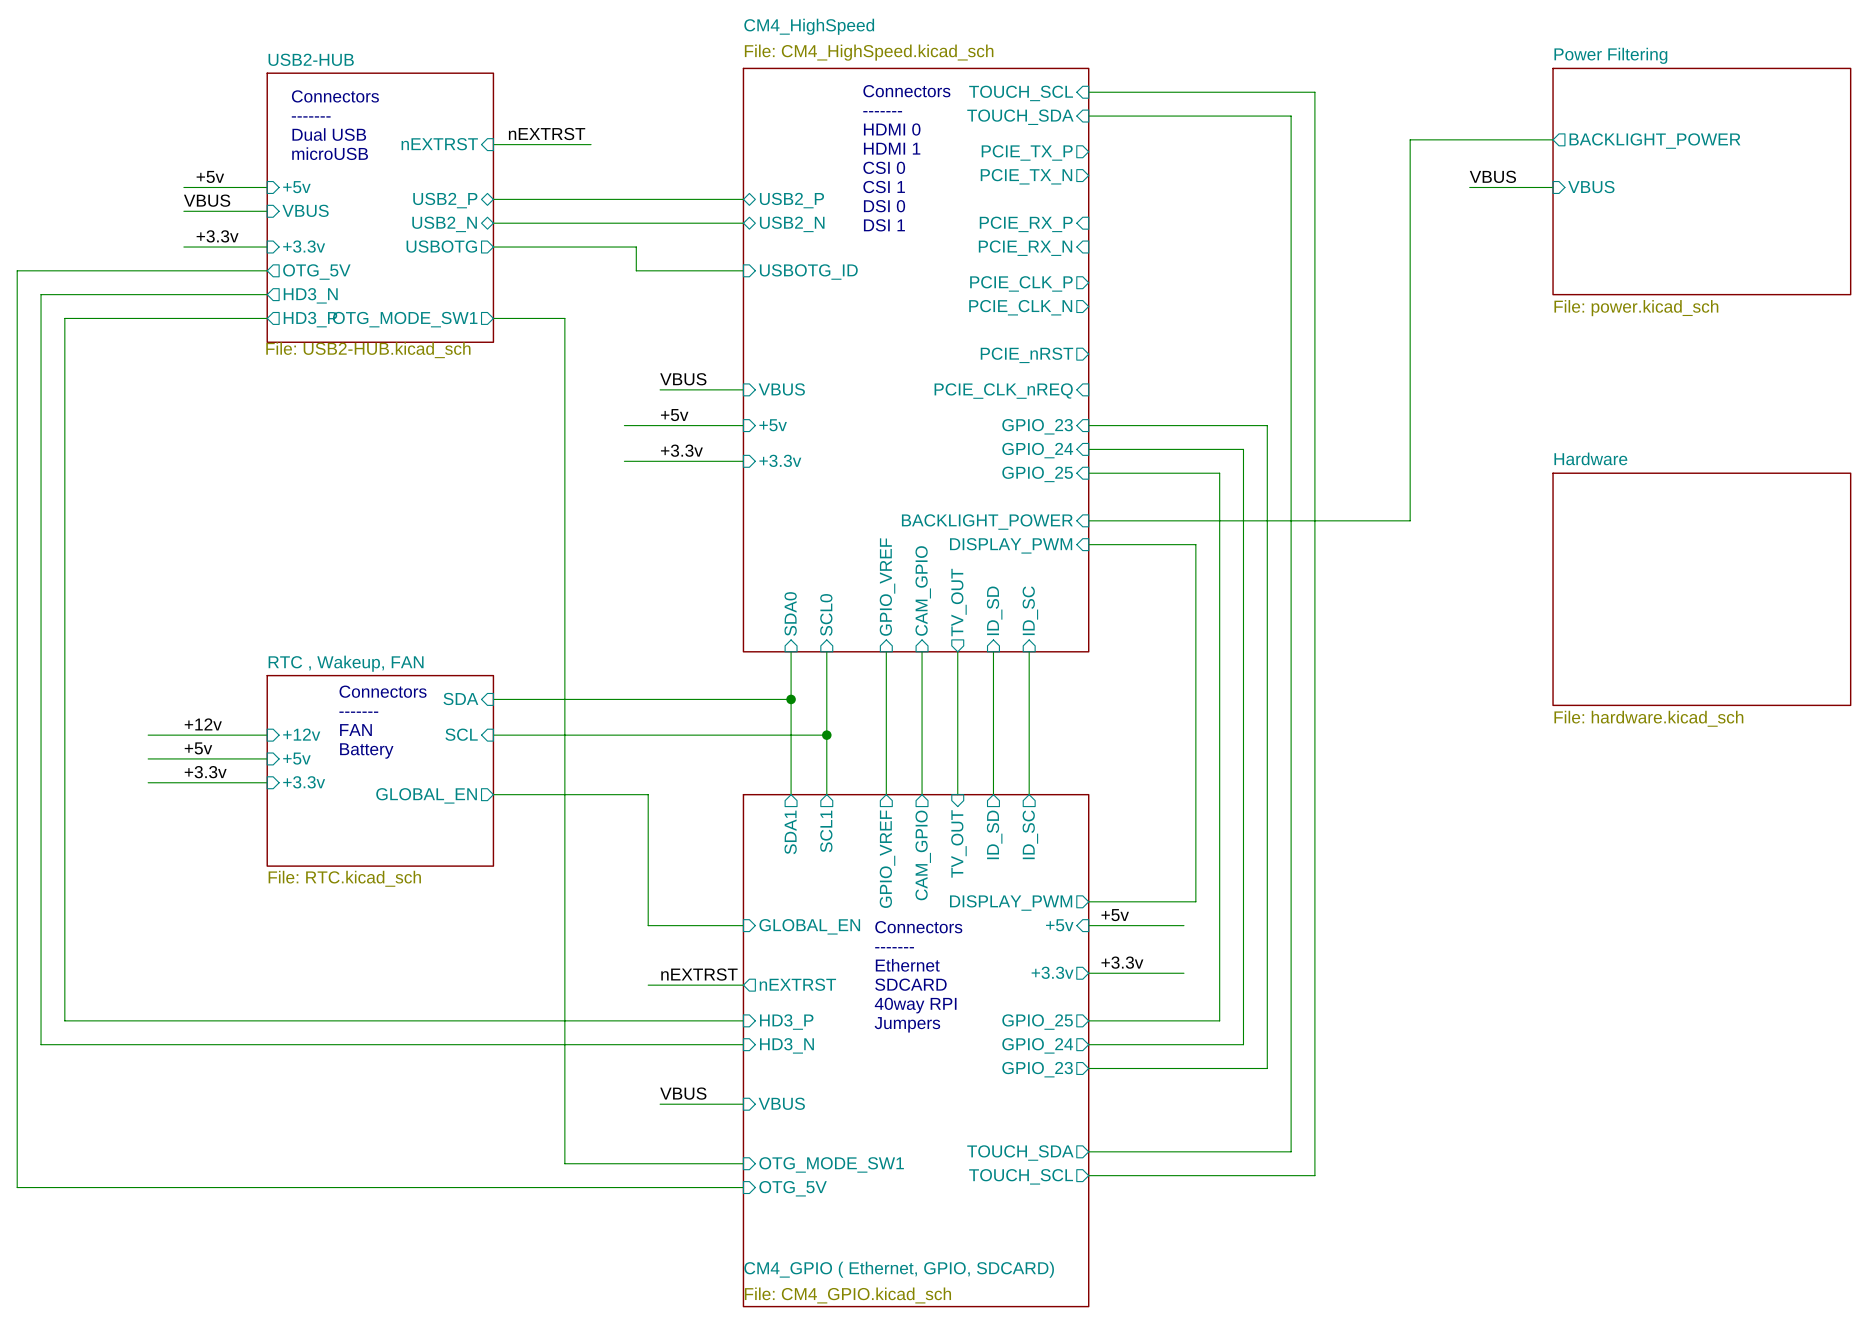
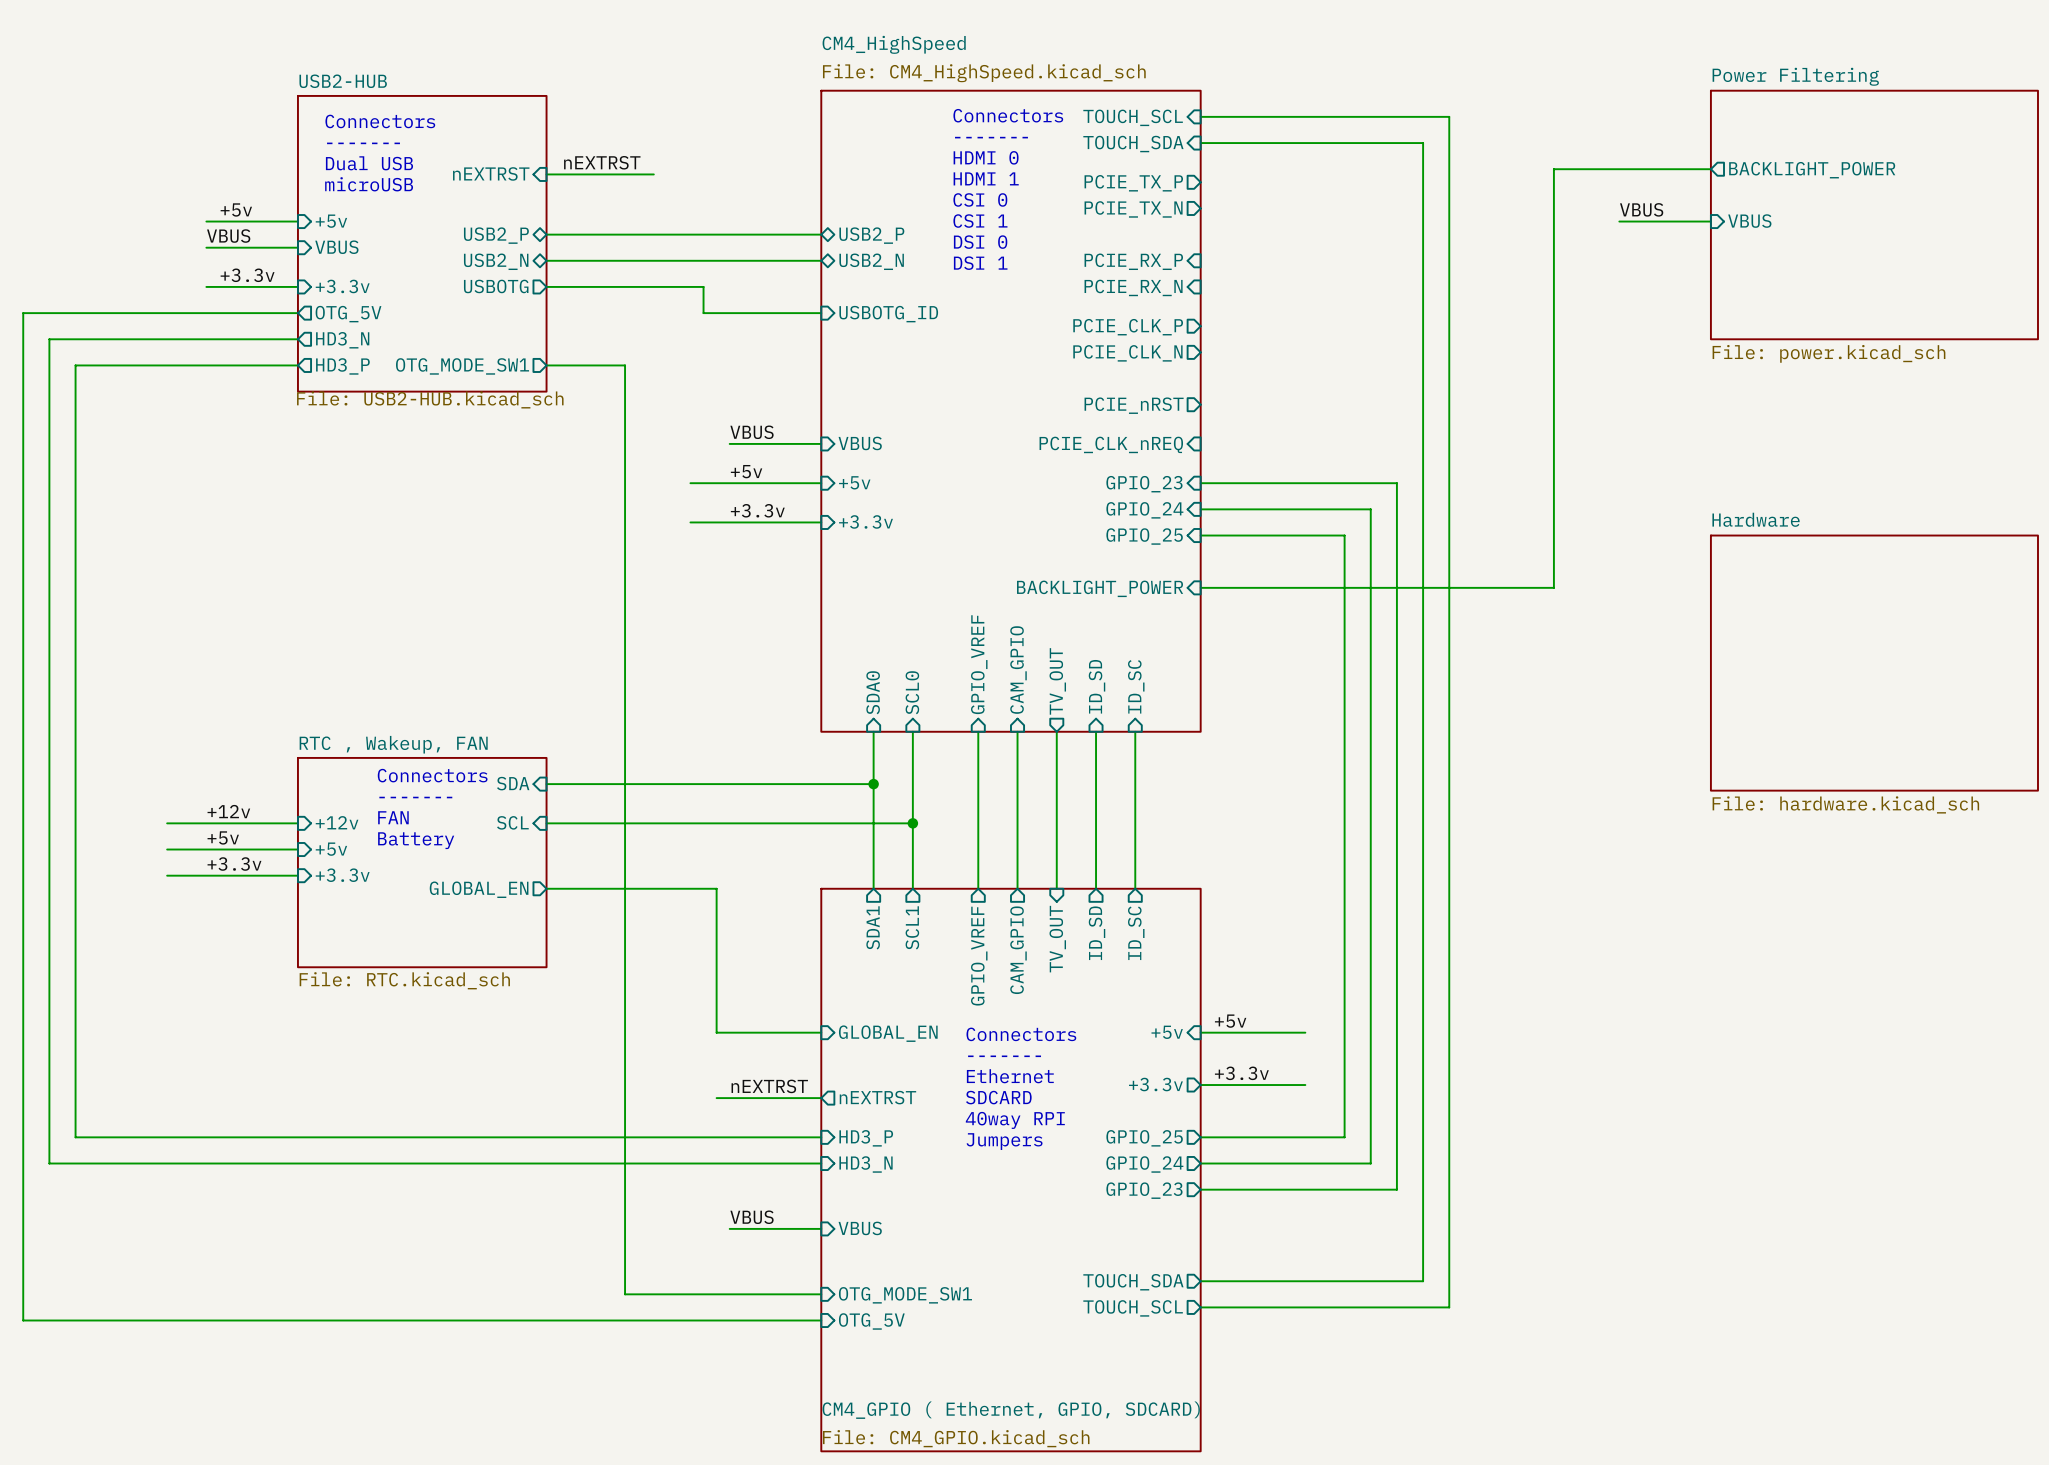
wire: (1088, 544) (1195, 544) (1195, 901) (1088, 901) -> none
sheet pin: DISPLAY_PWM (1011, 545) -> none
sheet pin: DISPLAY_PWM (1011, 903) -> none

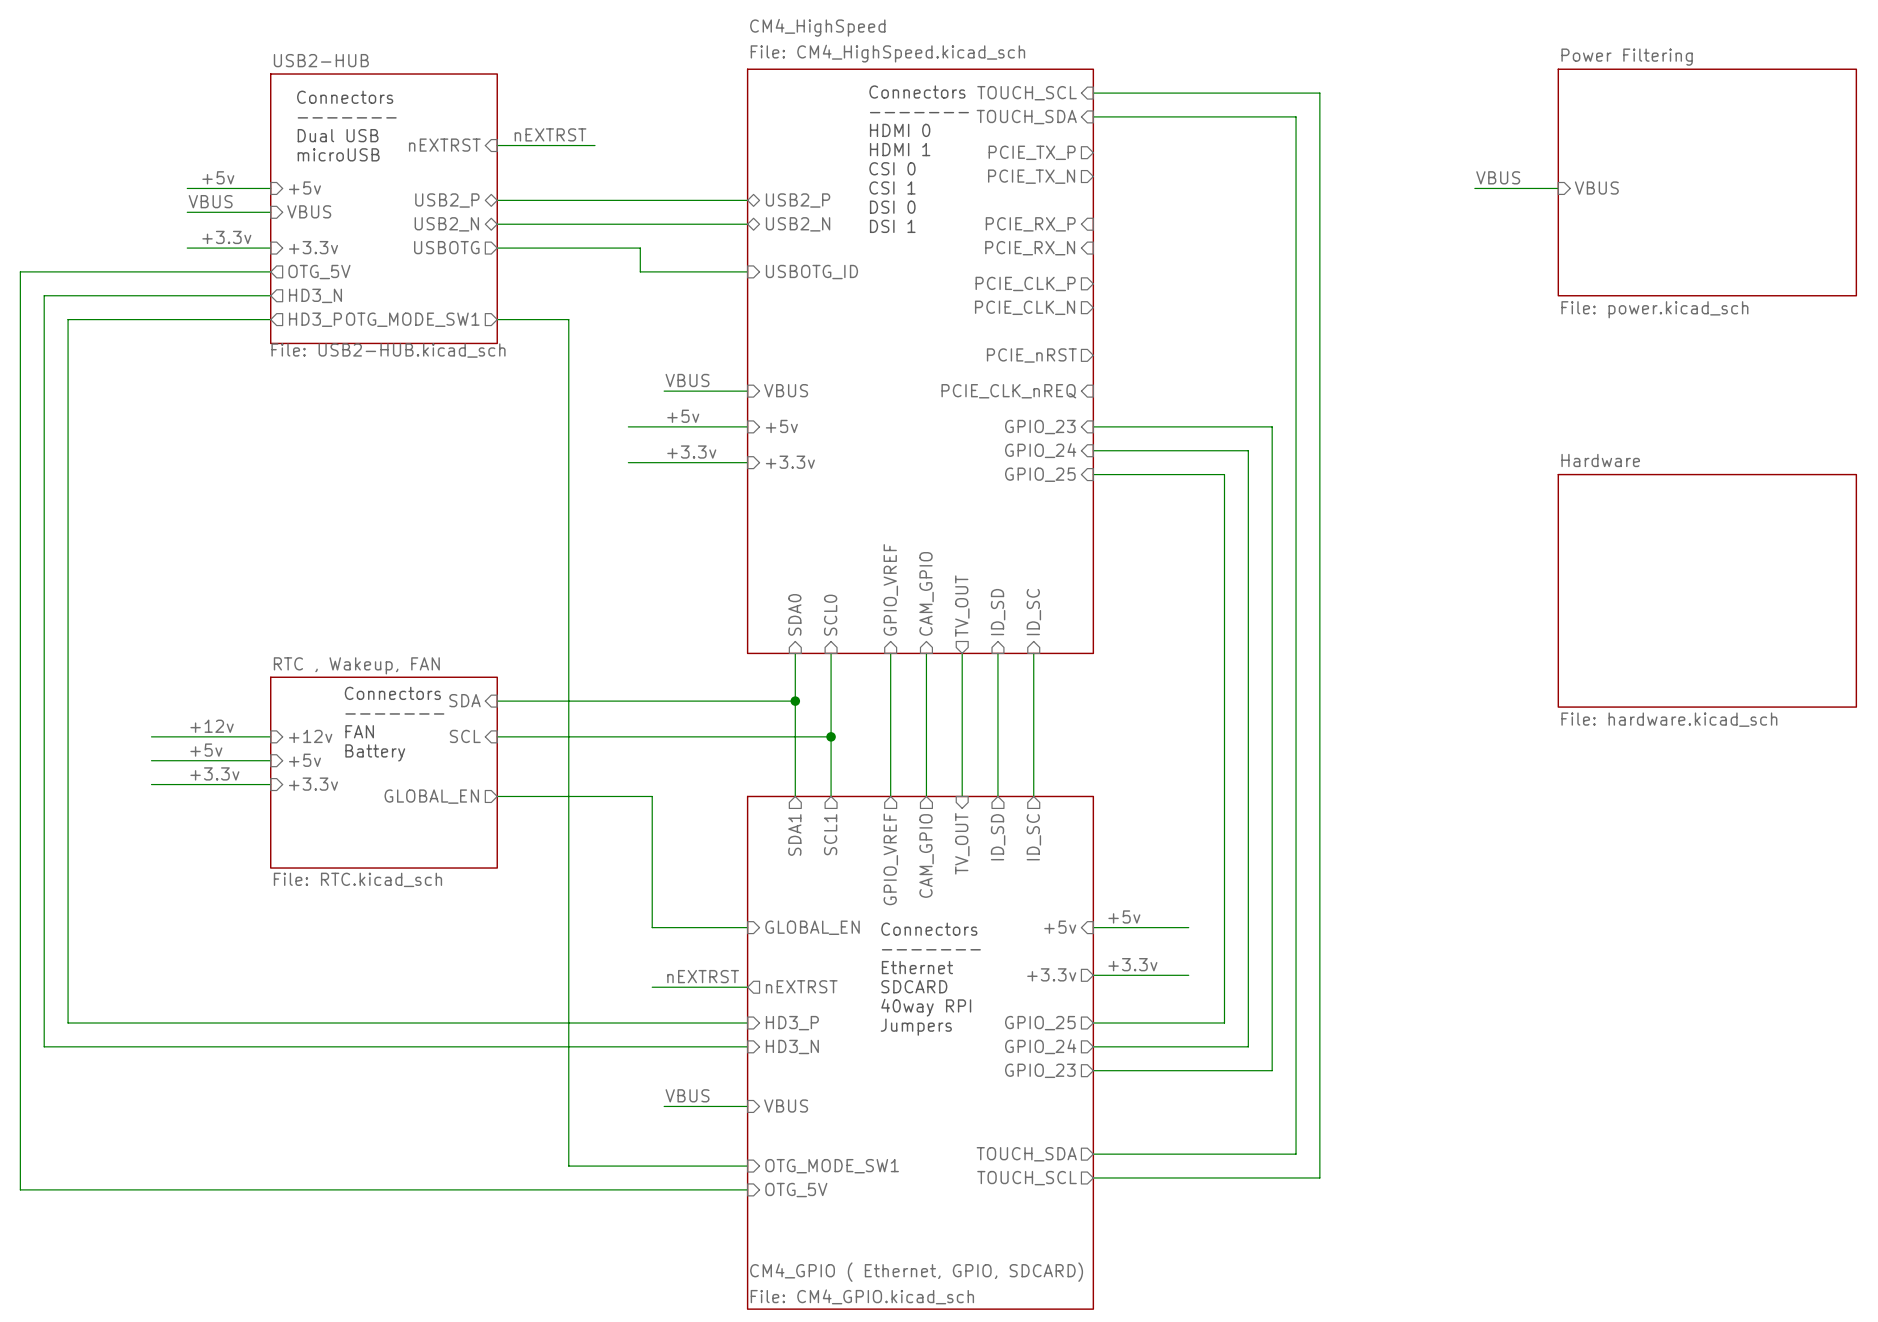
wire: (1710, 169) (1553, 169) (1553, 587) (1200, 587) -> none
sheet pin: BACKLIGHT_POWER (1812, 170) -> none
sheet pin: BACKLIGHT_POWER (1100, 588) -> none

